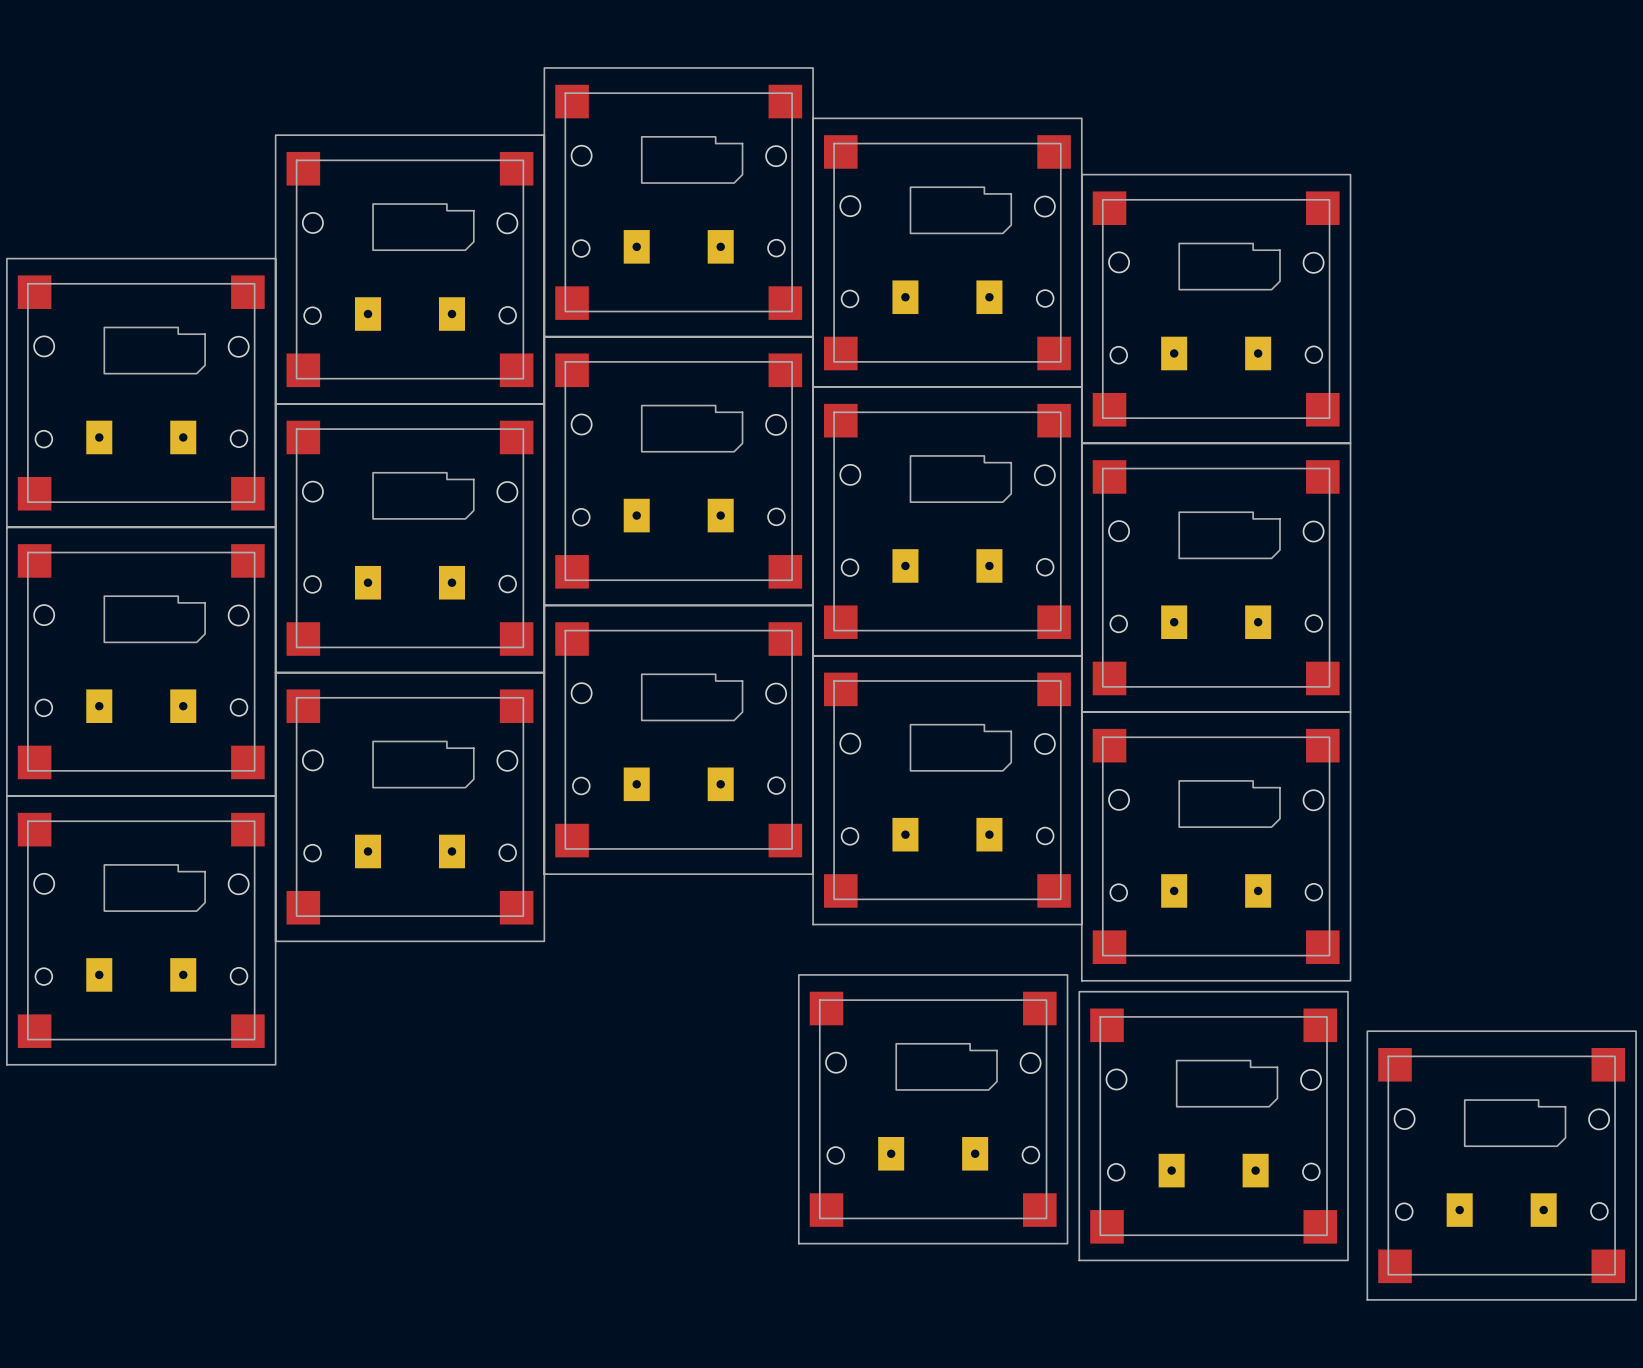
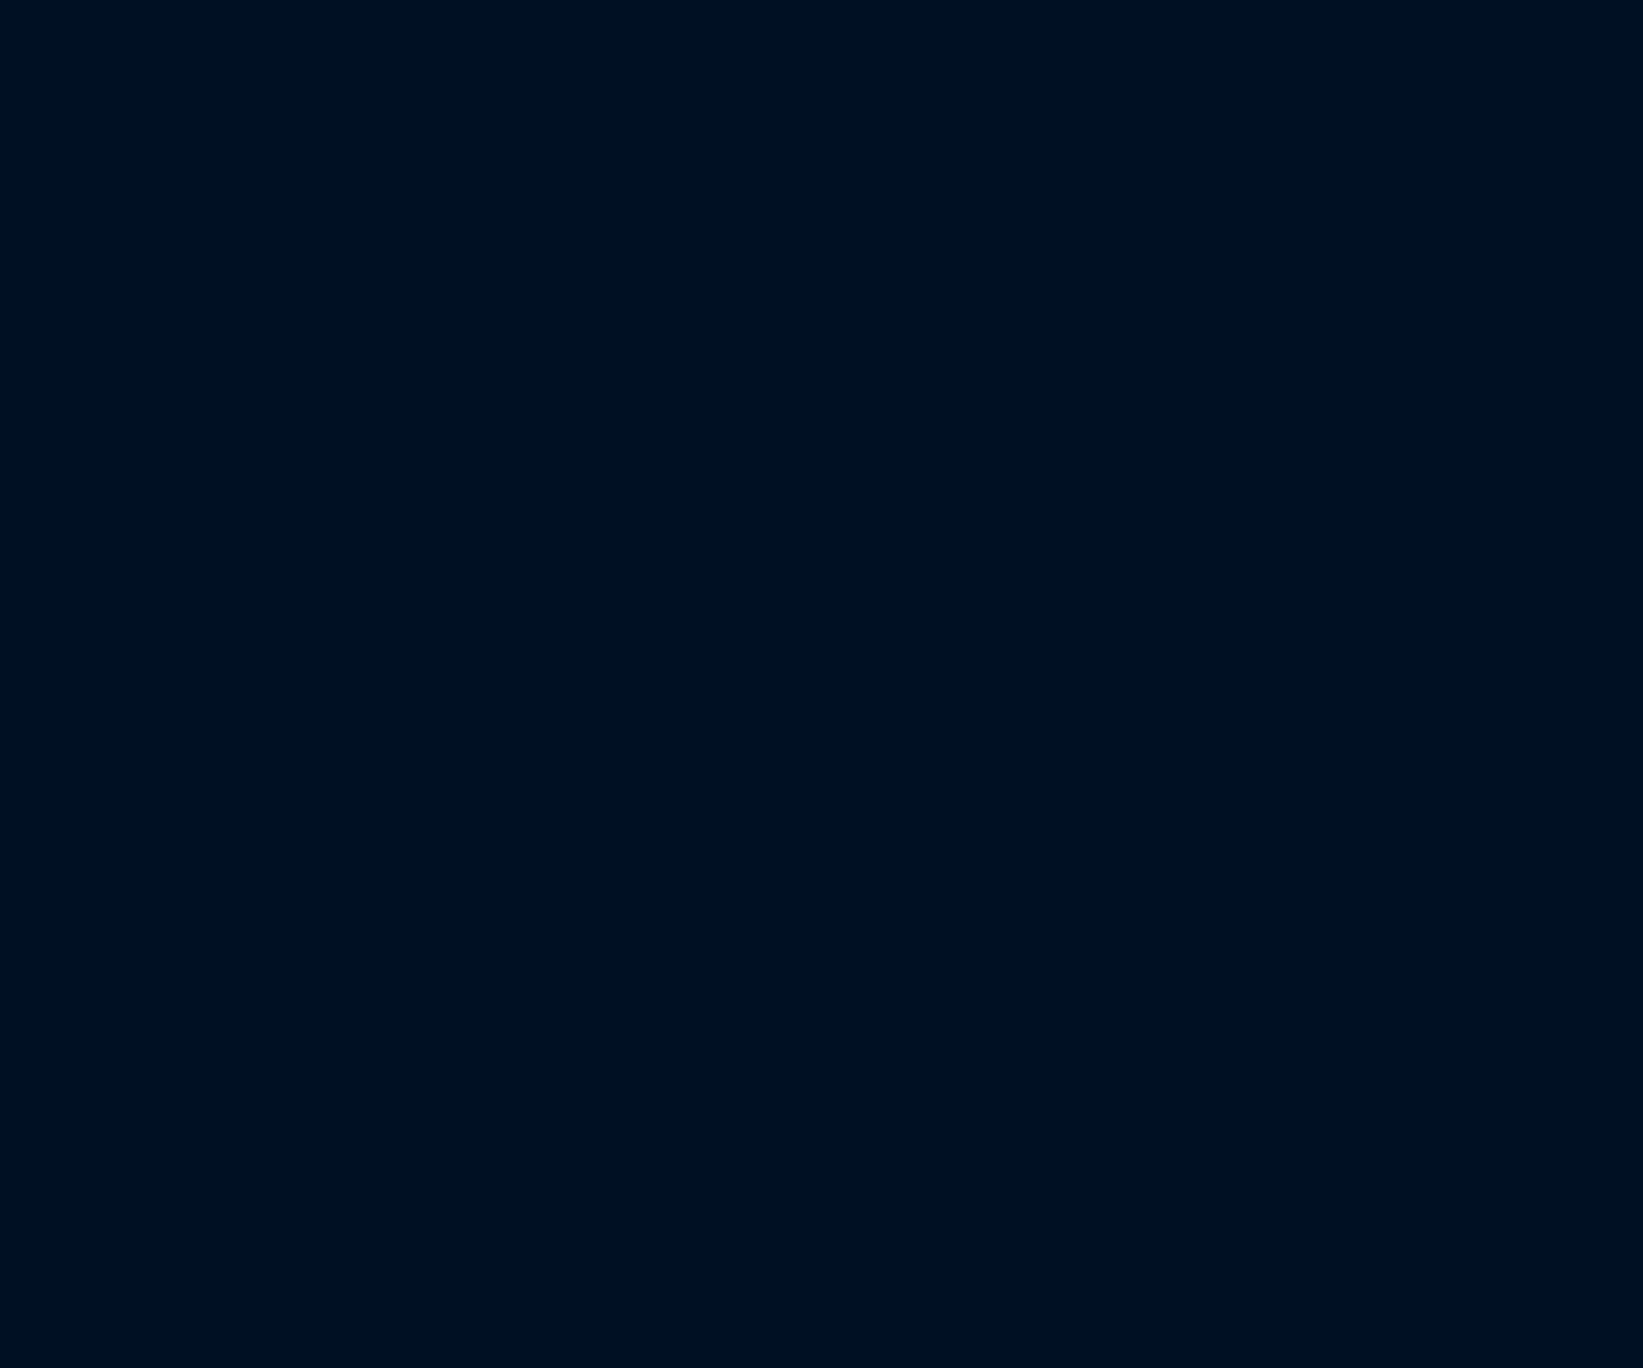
part: (678, 202) -> none
part: (947, 252) -> none
part: (409, 269) -> none
part: (1216, 308) -> none
part: (141, 392) -> none
part: (678, 471) -> none
part: (947, 521) -> none
part: (409, 538) -> none
part: (1216, 577) -> none
part: (141, 661) -> none
part: (678, 739) -> none
part: (947, 790) -> none
part: (409, 806) -> none
part: (1216, 846) -> none
part: (141, 930) -> none
part: (933, 1109) -> none
part: (1213, 1126) -> none
part: (1501, 1165) -> none

